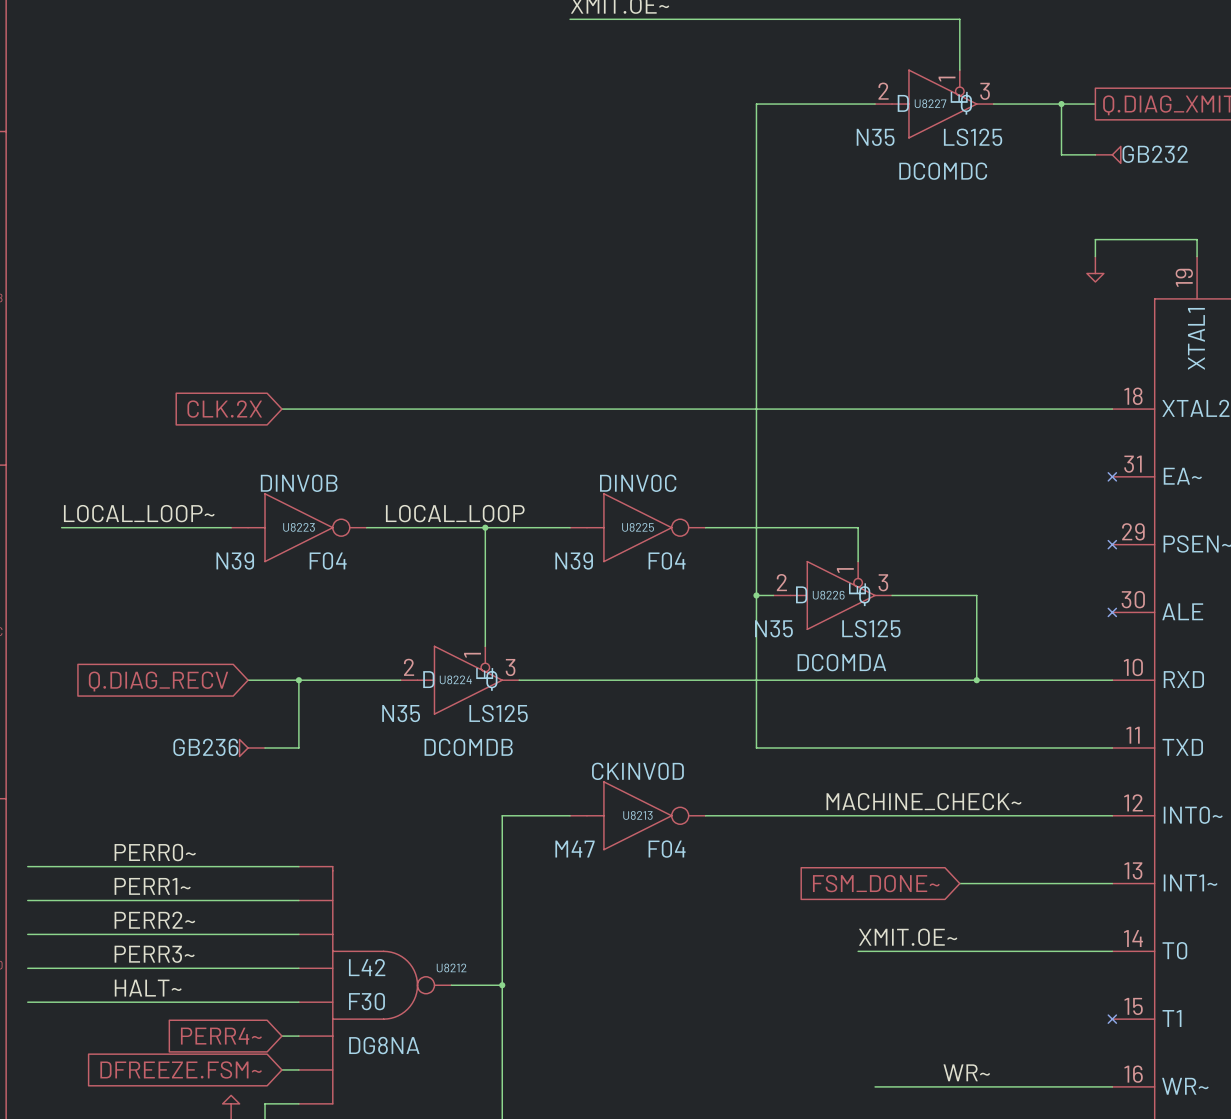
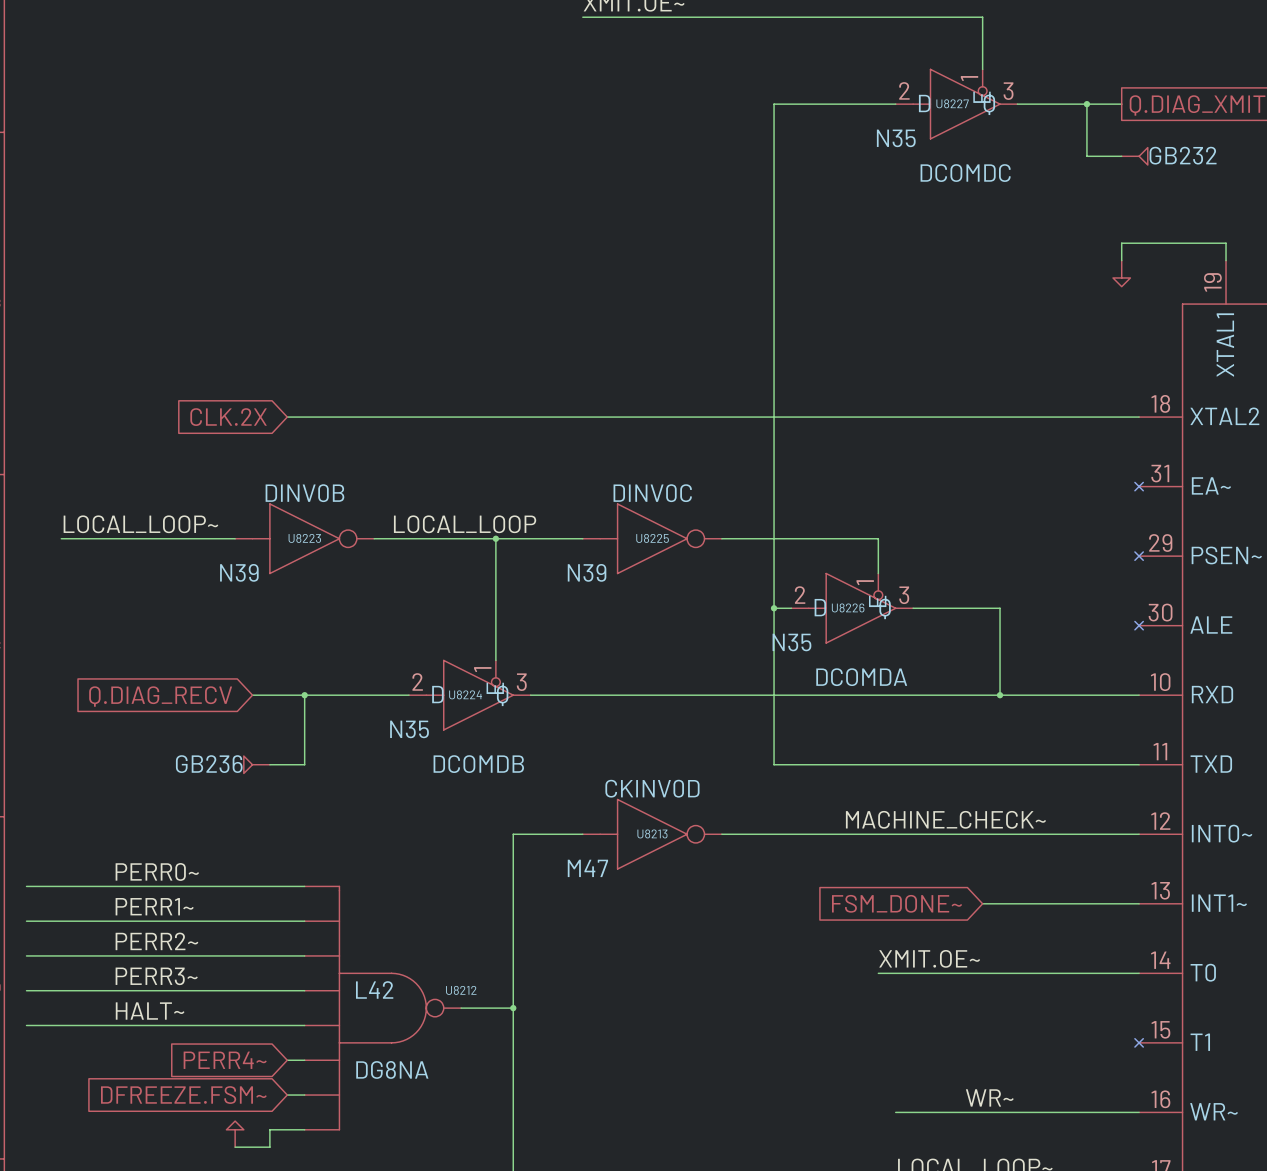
U8227 value: LS125 (973, 137) -> none
U8223 value: F04 (328, 560) -> none
U8225 value: F04 (667, 560) -> none
U8226 value: LS125 (871, 628) -> none
U8224 value: LS125 (498, 713) -> none
U8213 value: F04 (667, 849) -> none
U8212 value: F30 (366, 1001) -> none

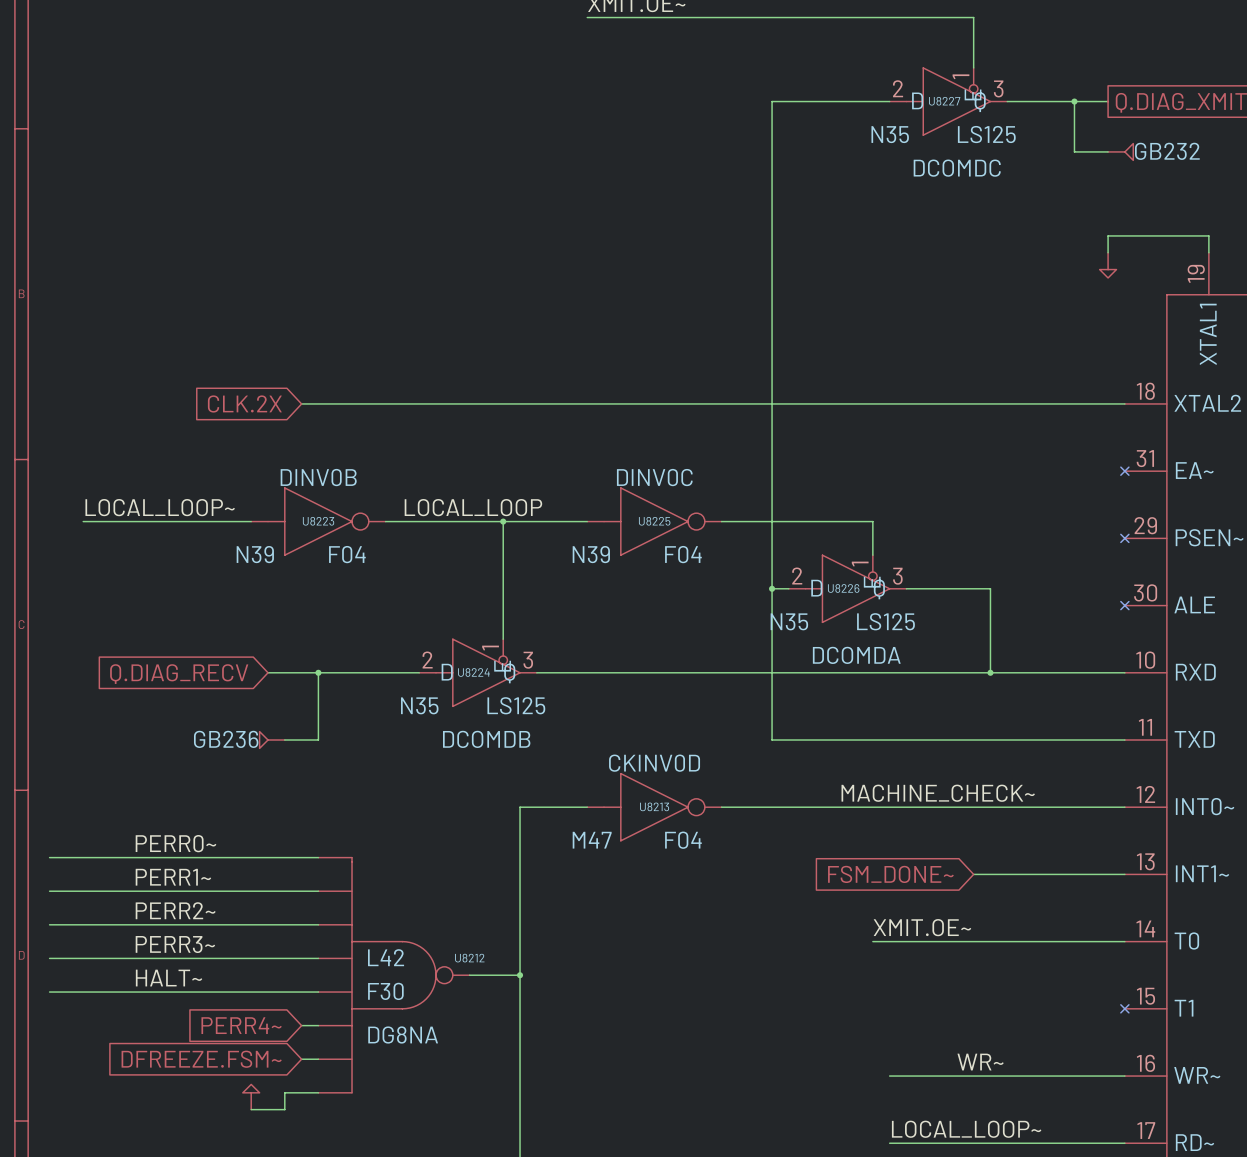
U8227 value: none -> LS125 (986, 134)
U8223 value: none -> F04 (347, 554)
U8225 value: none -> F04 (683, 554)
U8226 value: none -> LS125 (885, 621)
U8224 value: none -> LS125 (516, 705)
U8213 value: none -> F04 (683, 840)
U8212 value: none -> F30 (385, 991)

